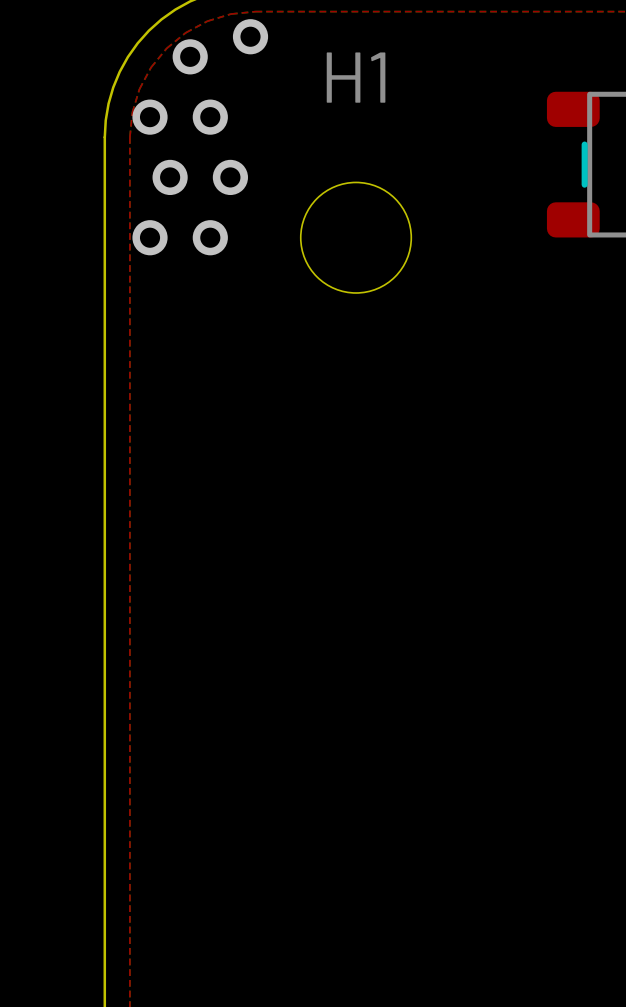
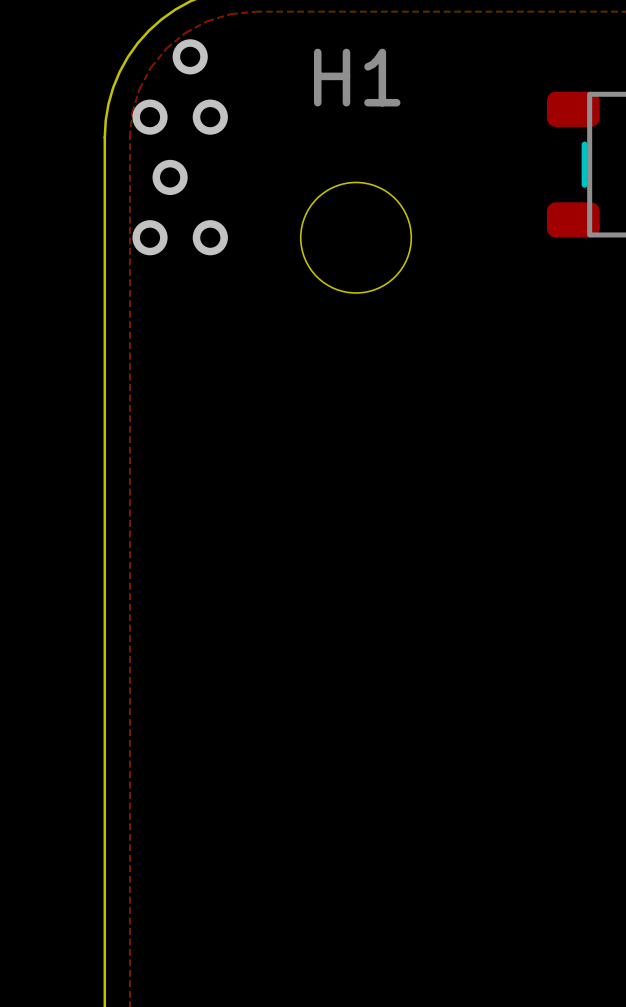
via: (250, 36) -> none
via: (230, 177) -> none

